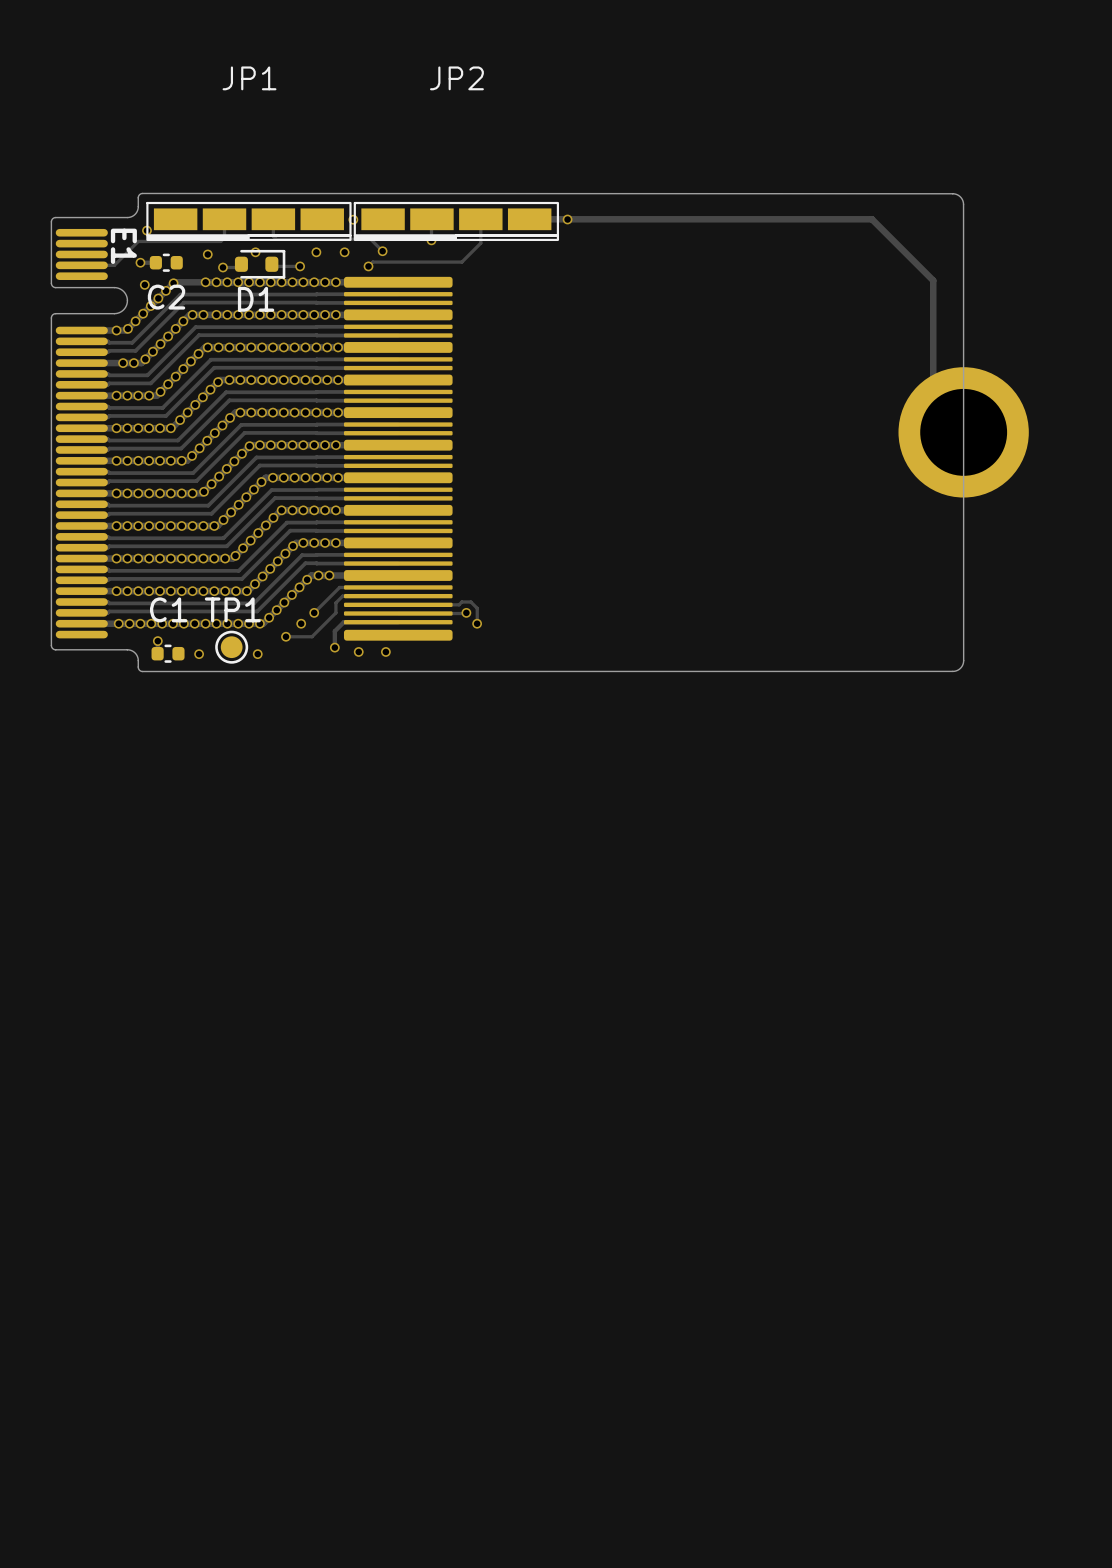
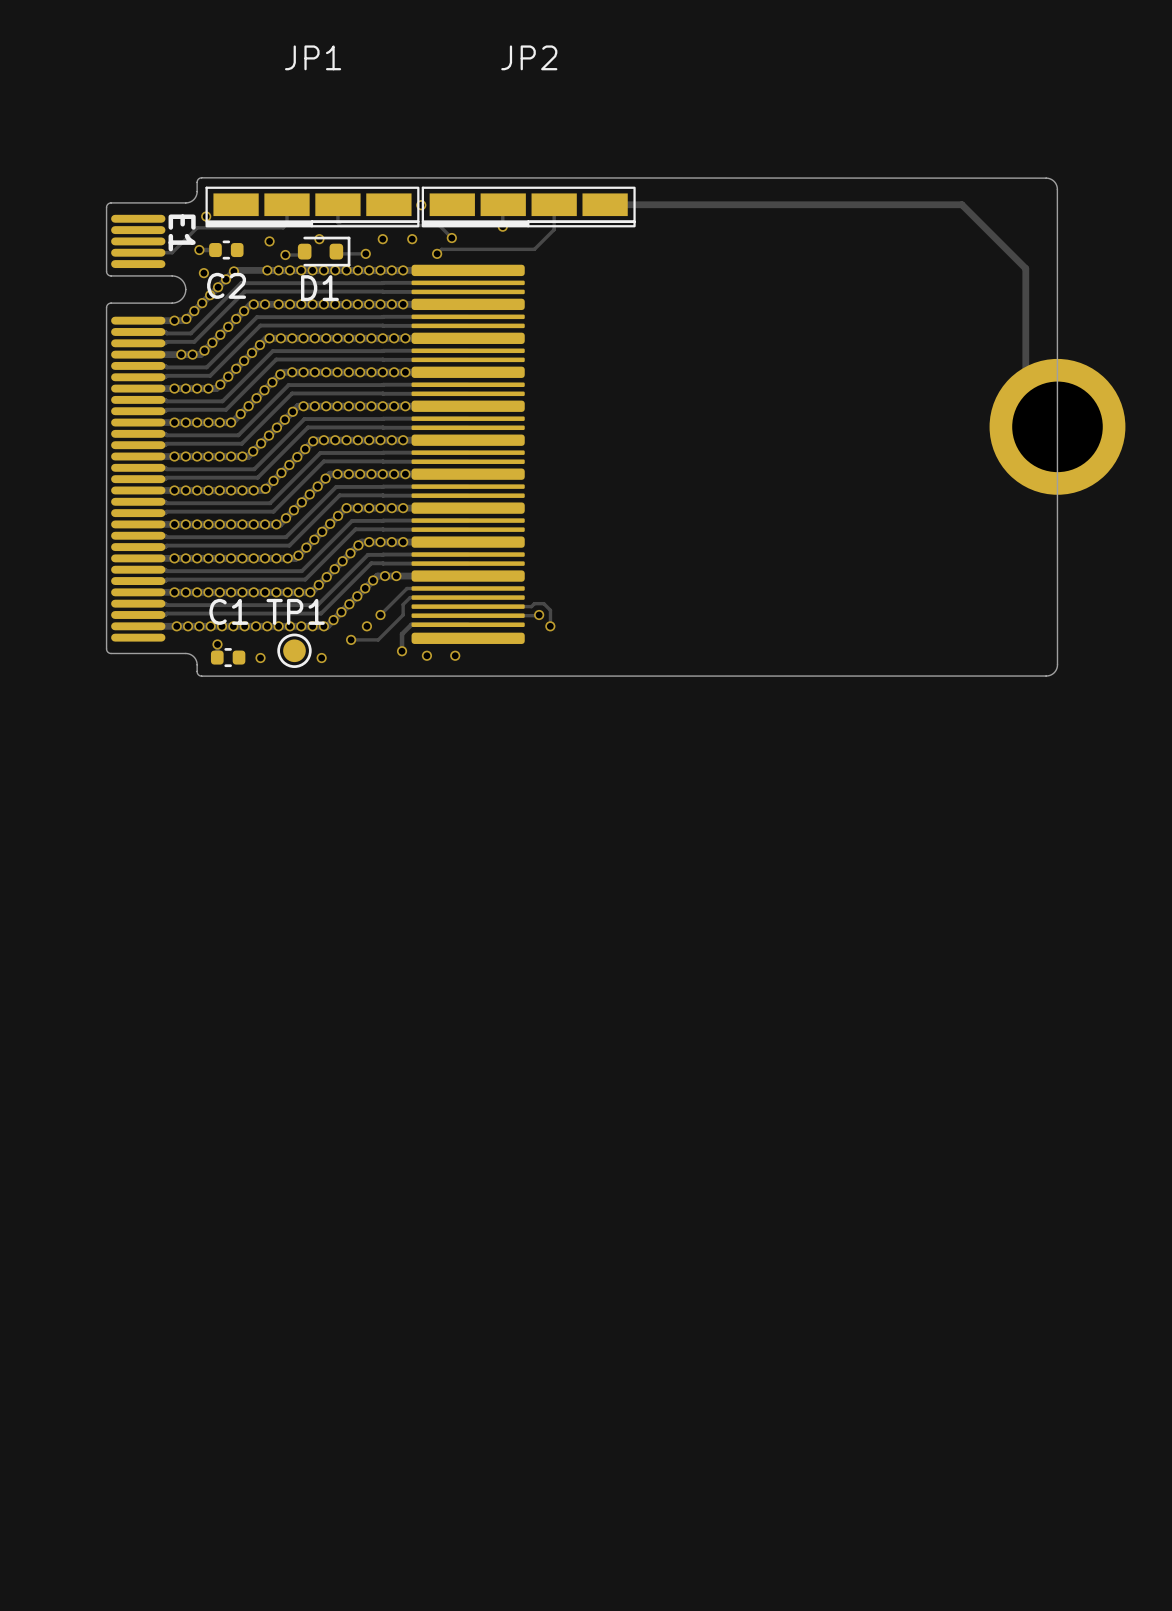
via: (567, 219) -> none

